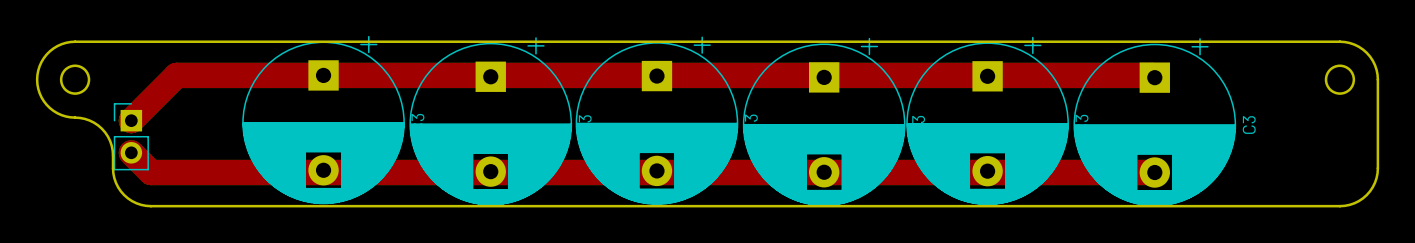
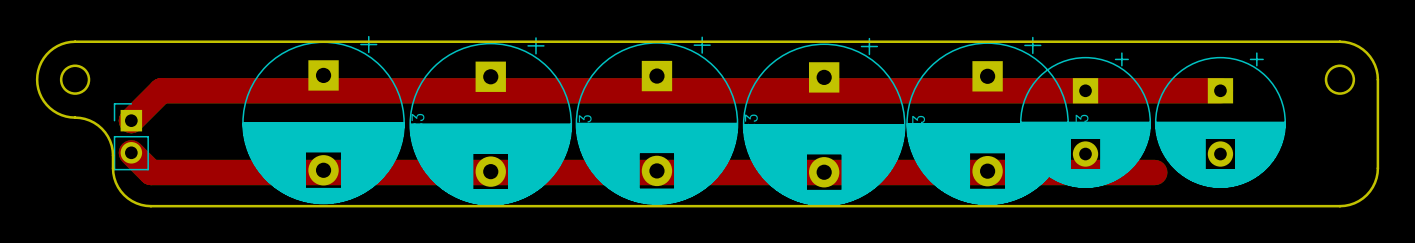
top track: (1154, 77) (1152, 75) (176, 75) (161, 90) -> (1220, 90) (161, 90)
part: none -> (1085, 120)
part: none -> (1220, 120)
C3: (1154, 122) -> none

